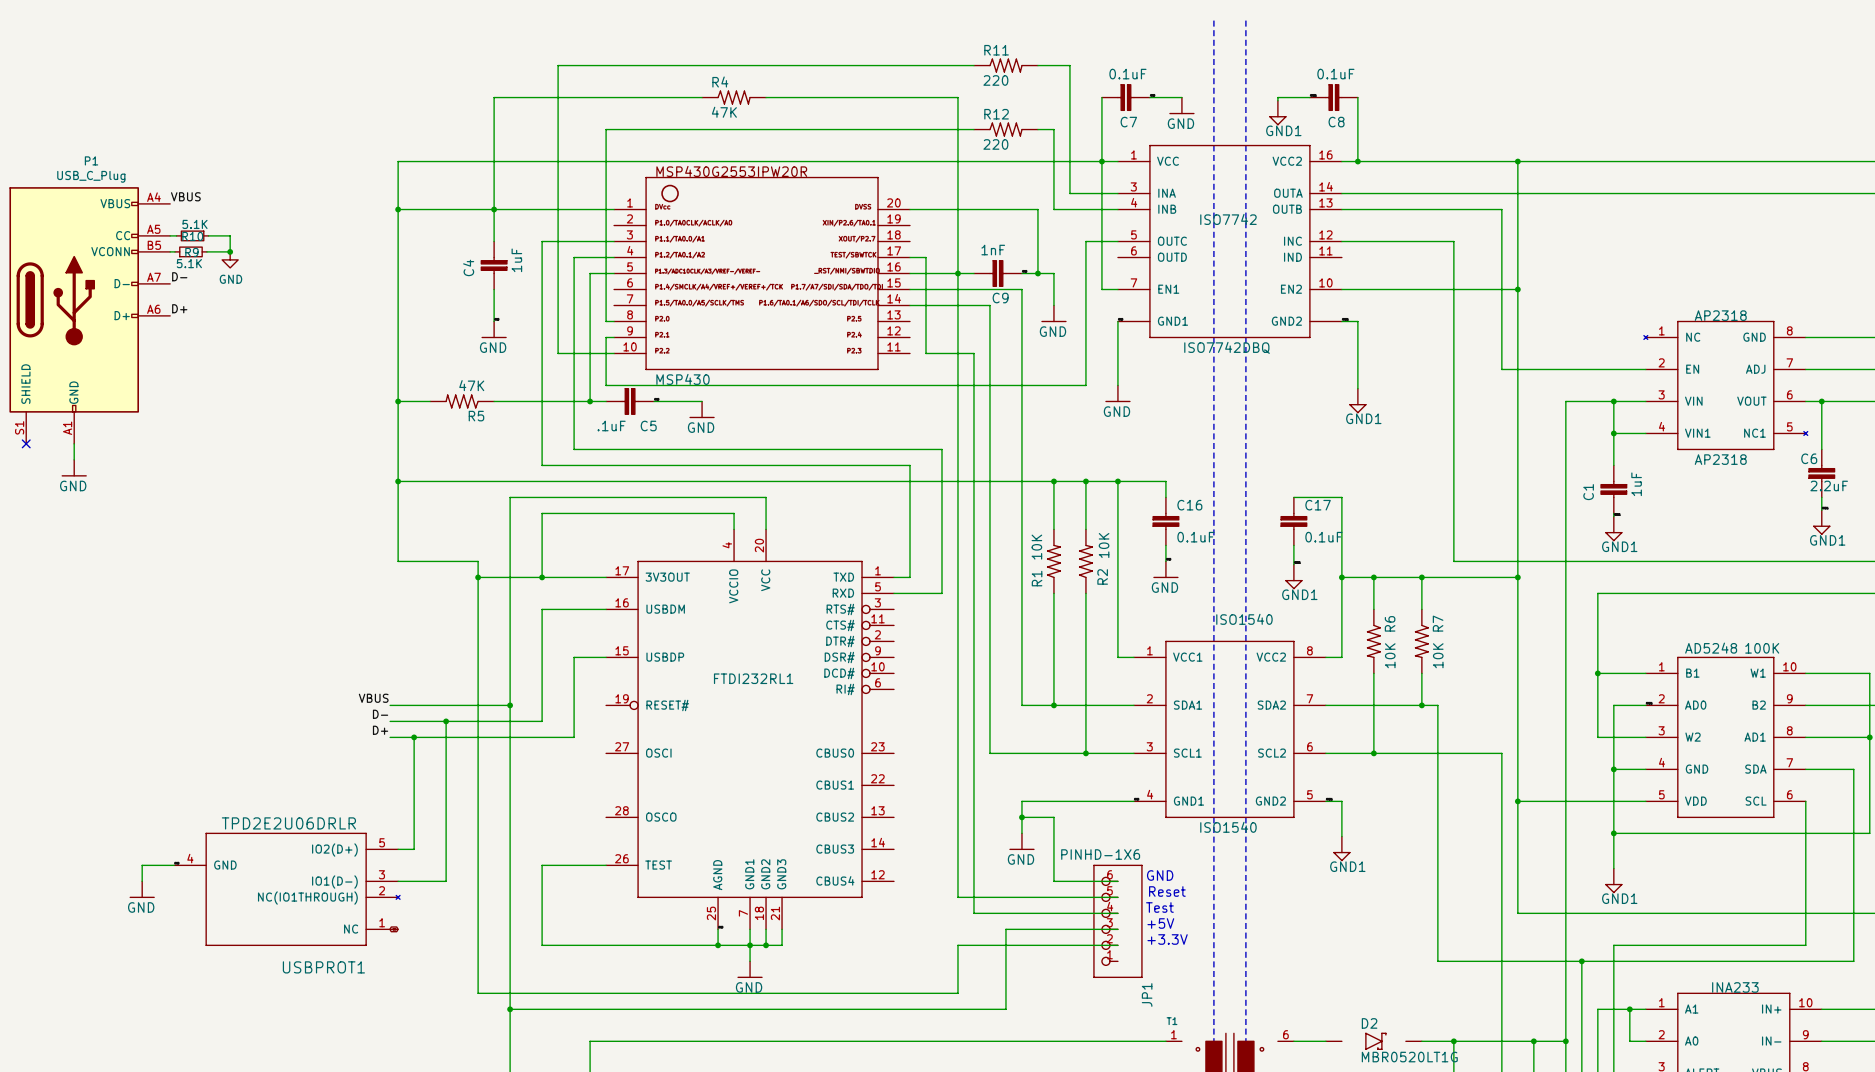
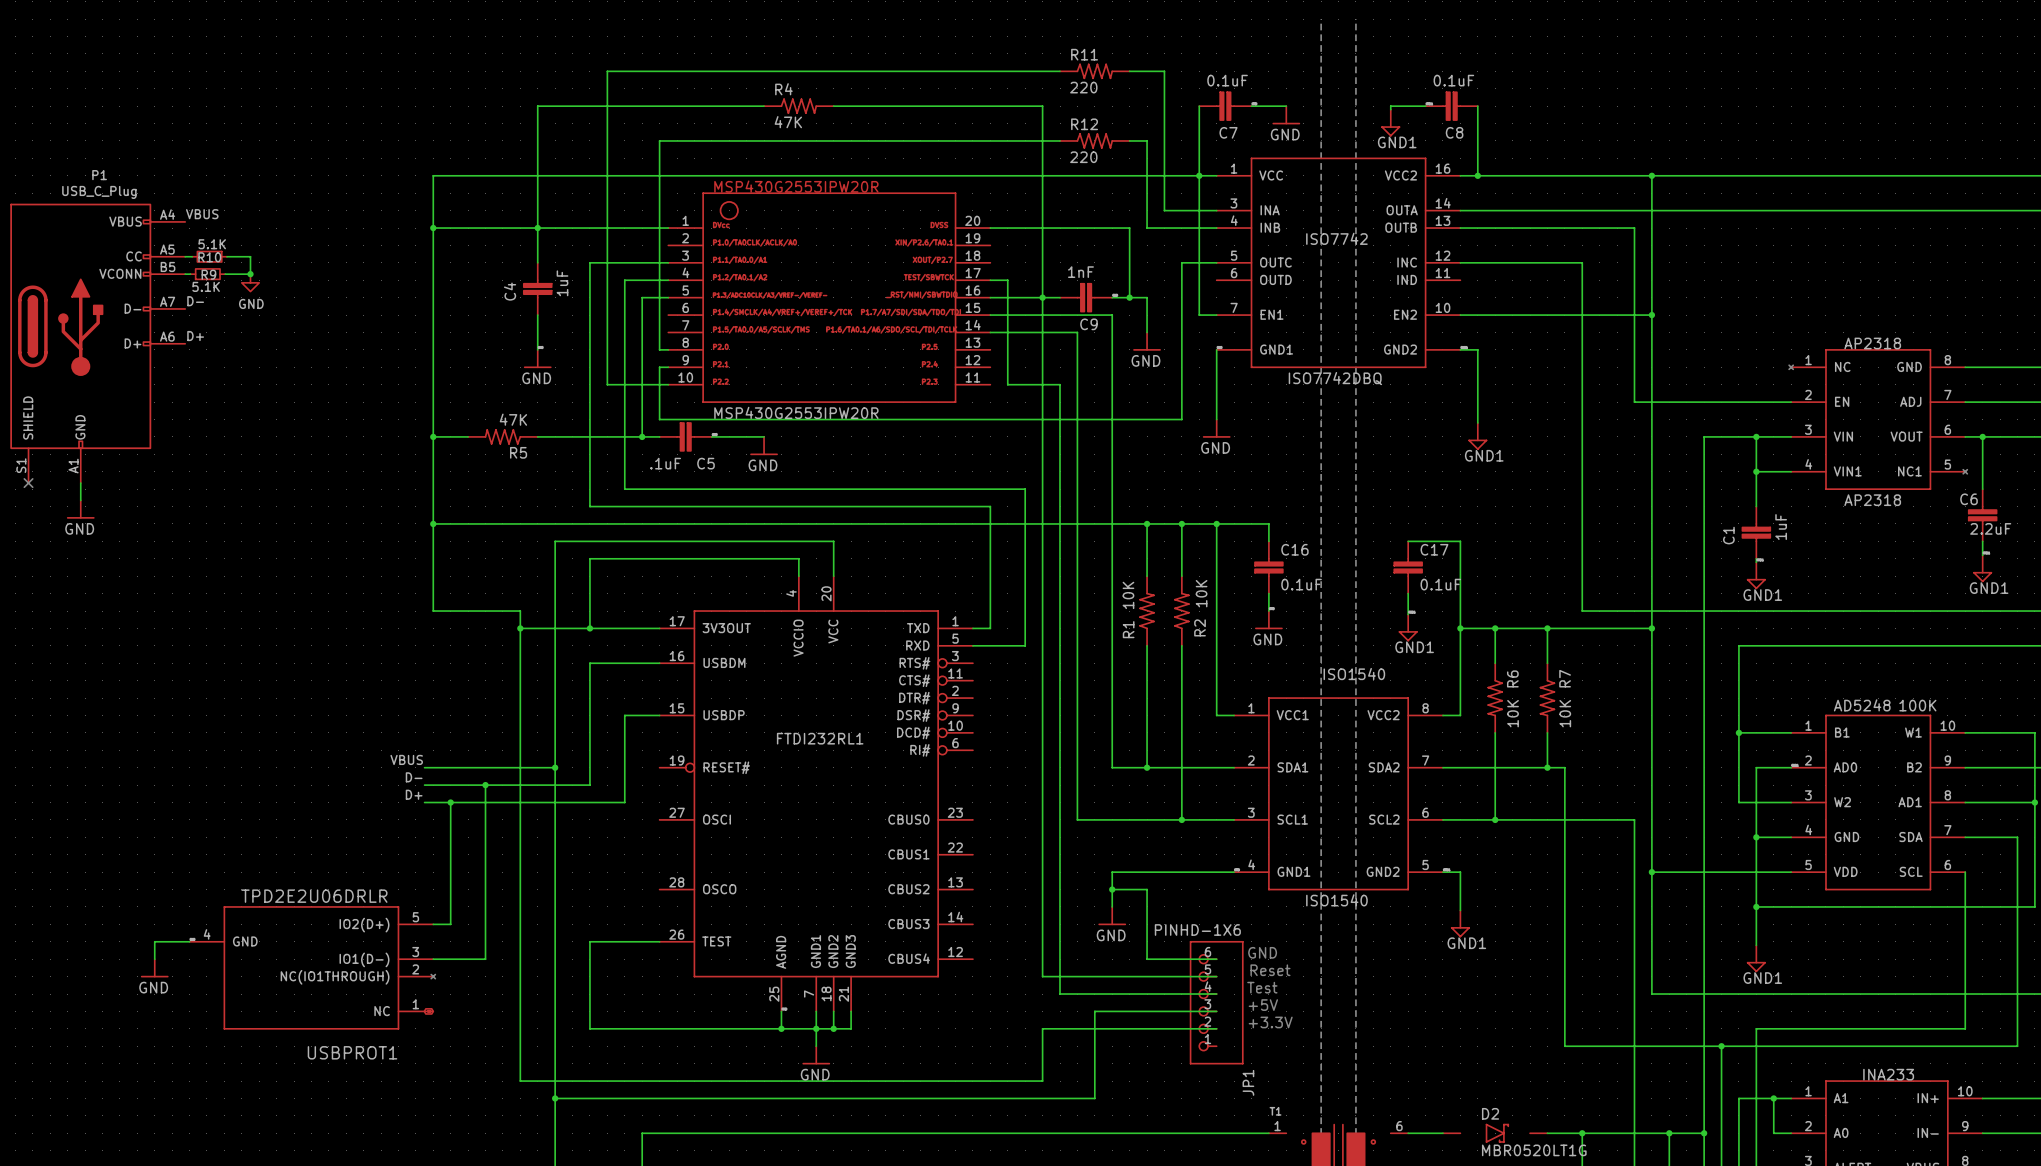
MSP430 name: MSP430 (683, 379) -> MSP430G2553IPW20R (796, 412)

